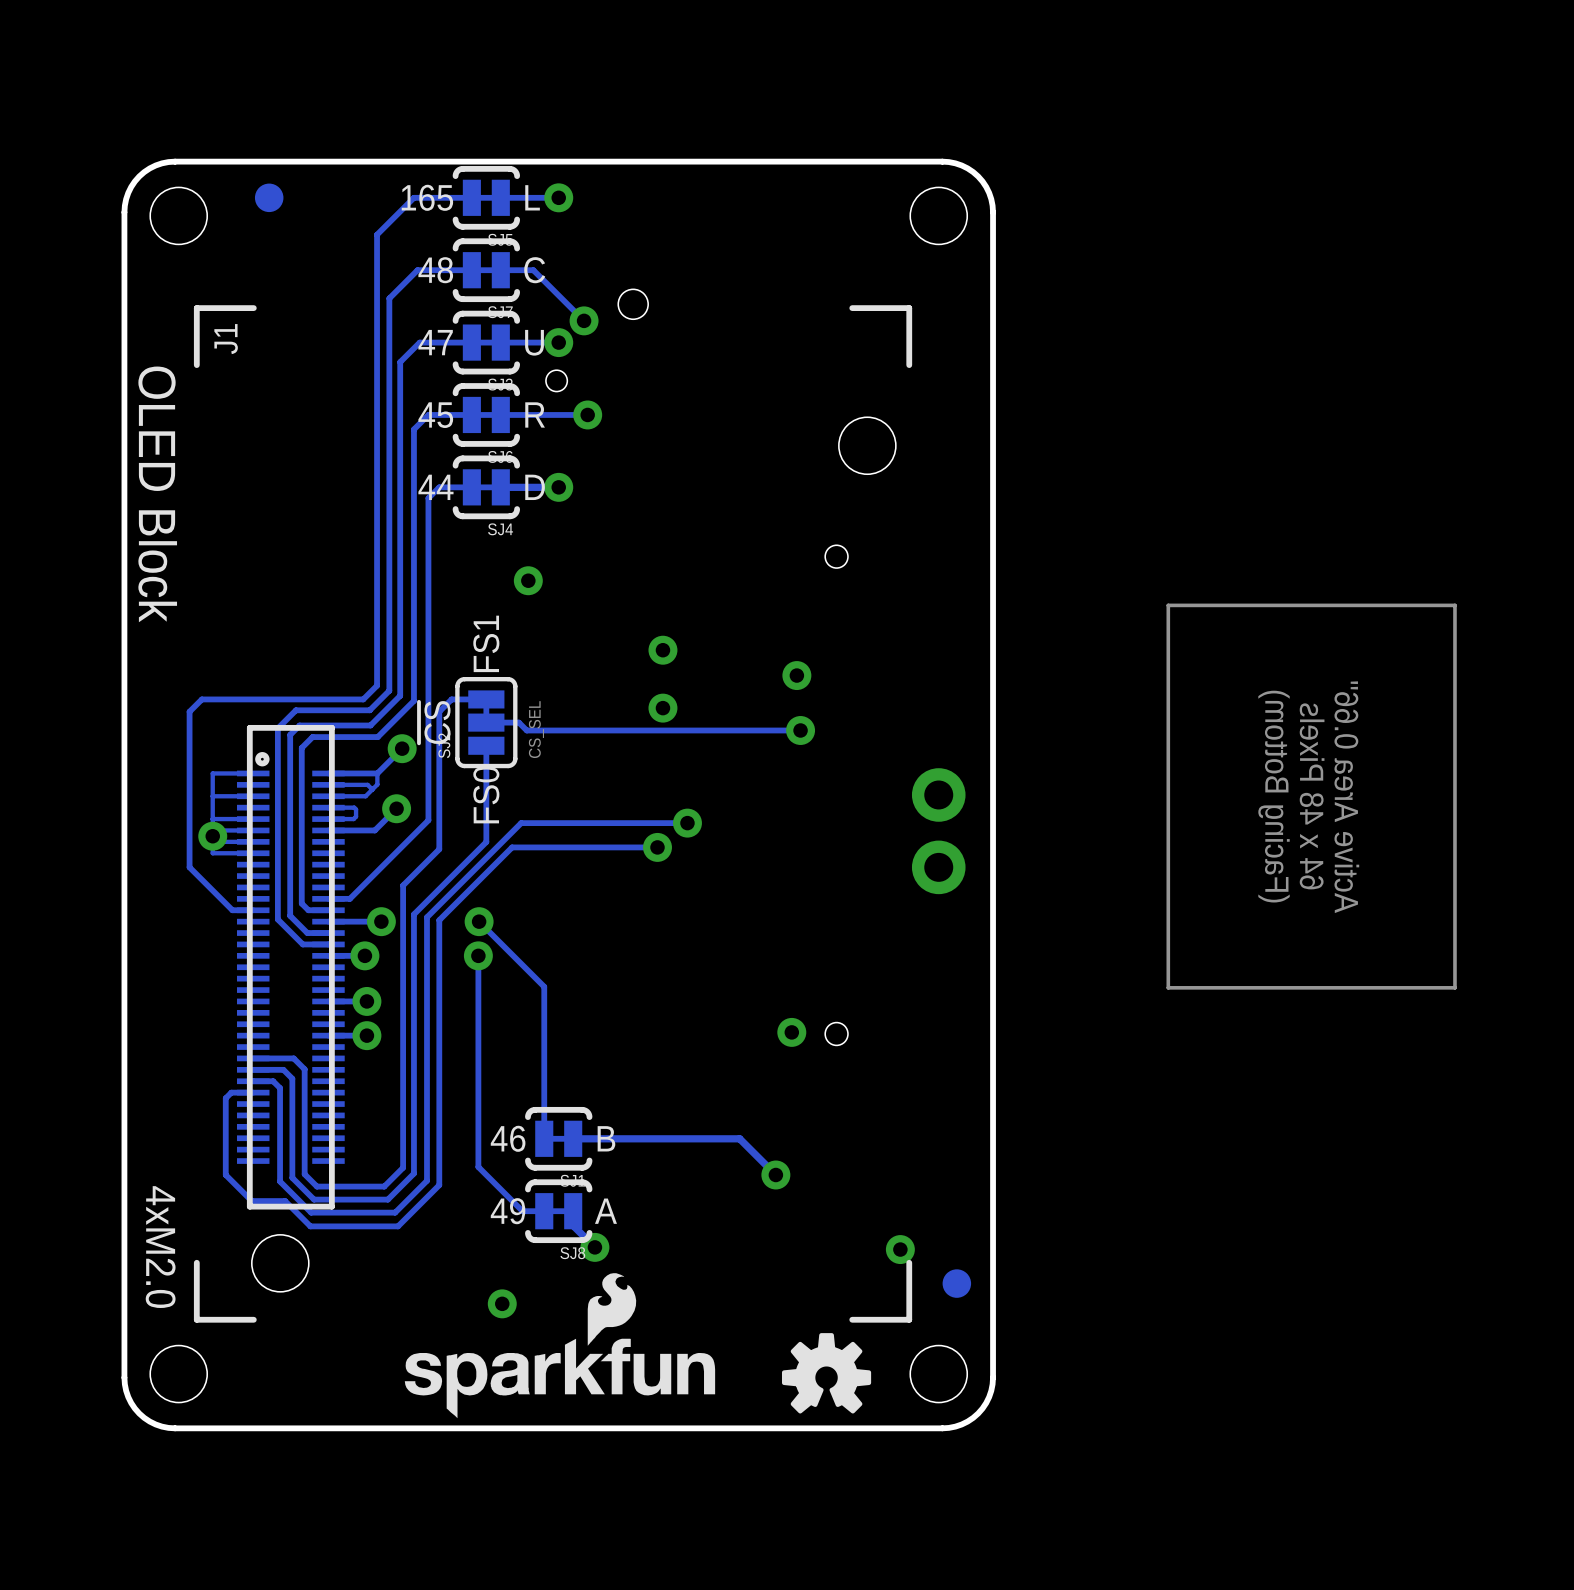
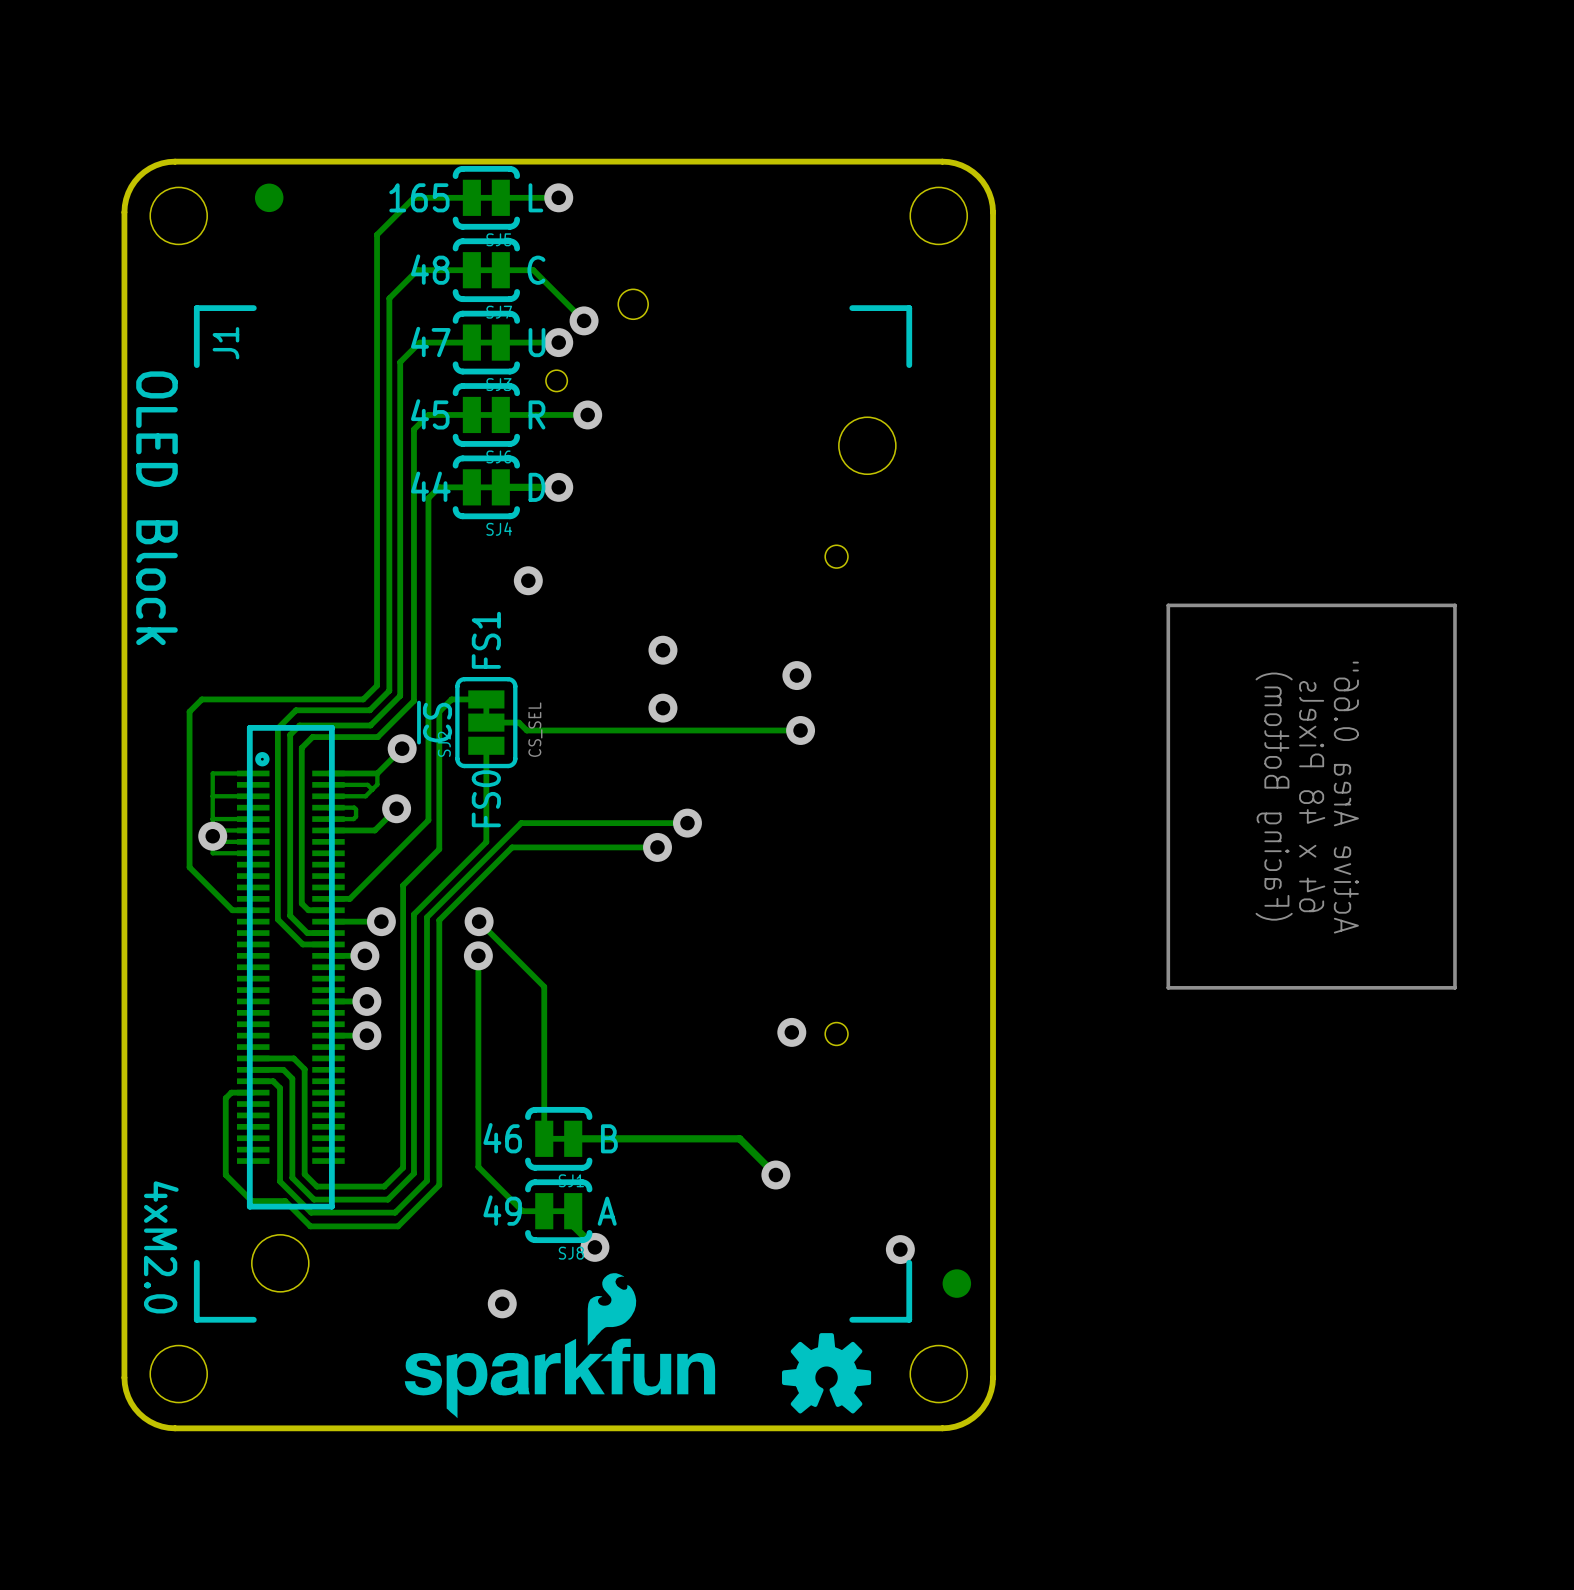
part: (938, 831) -> none

